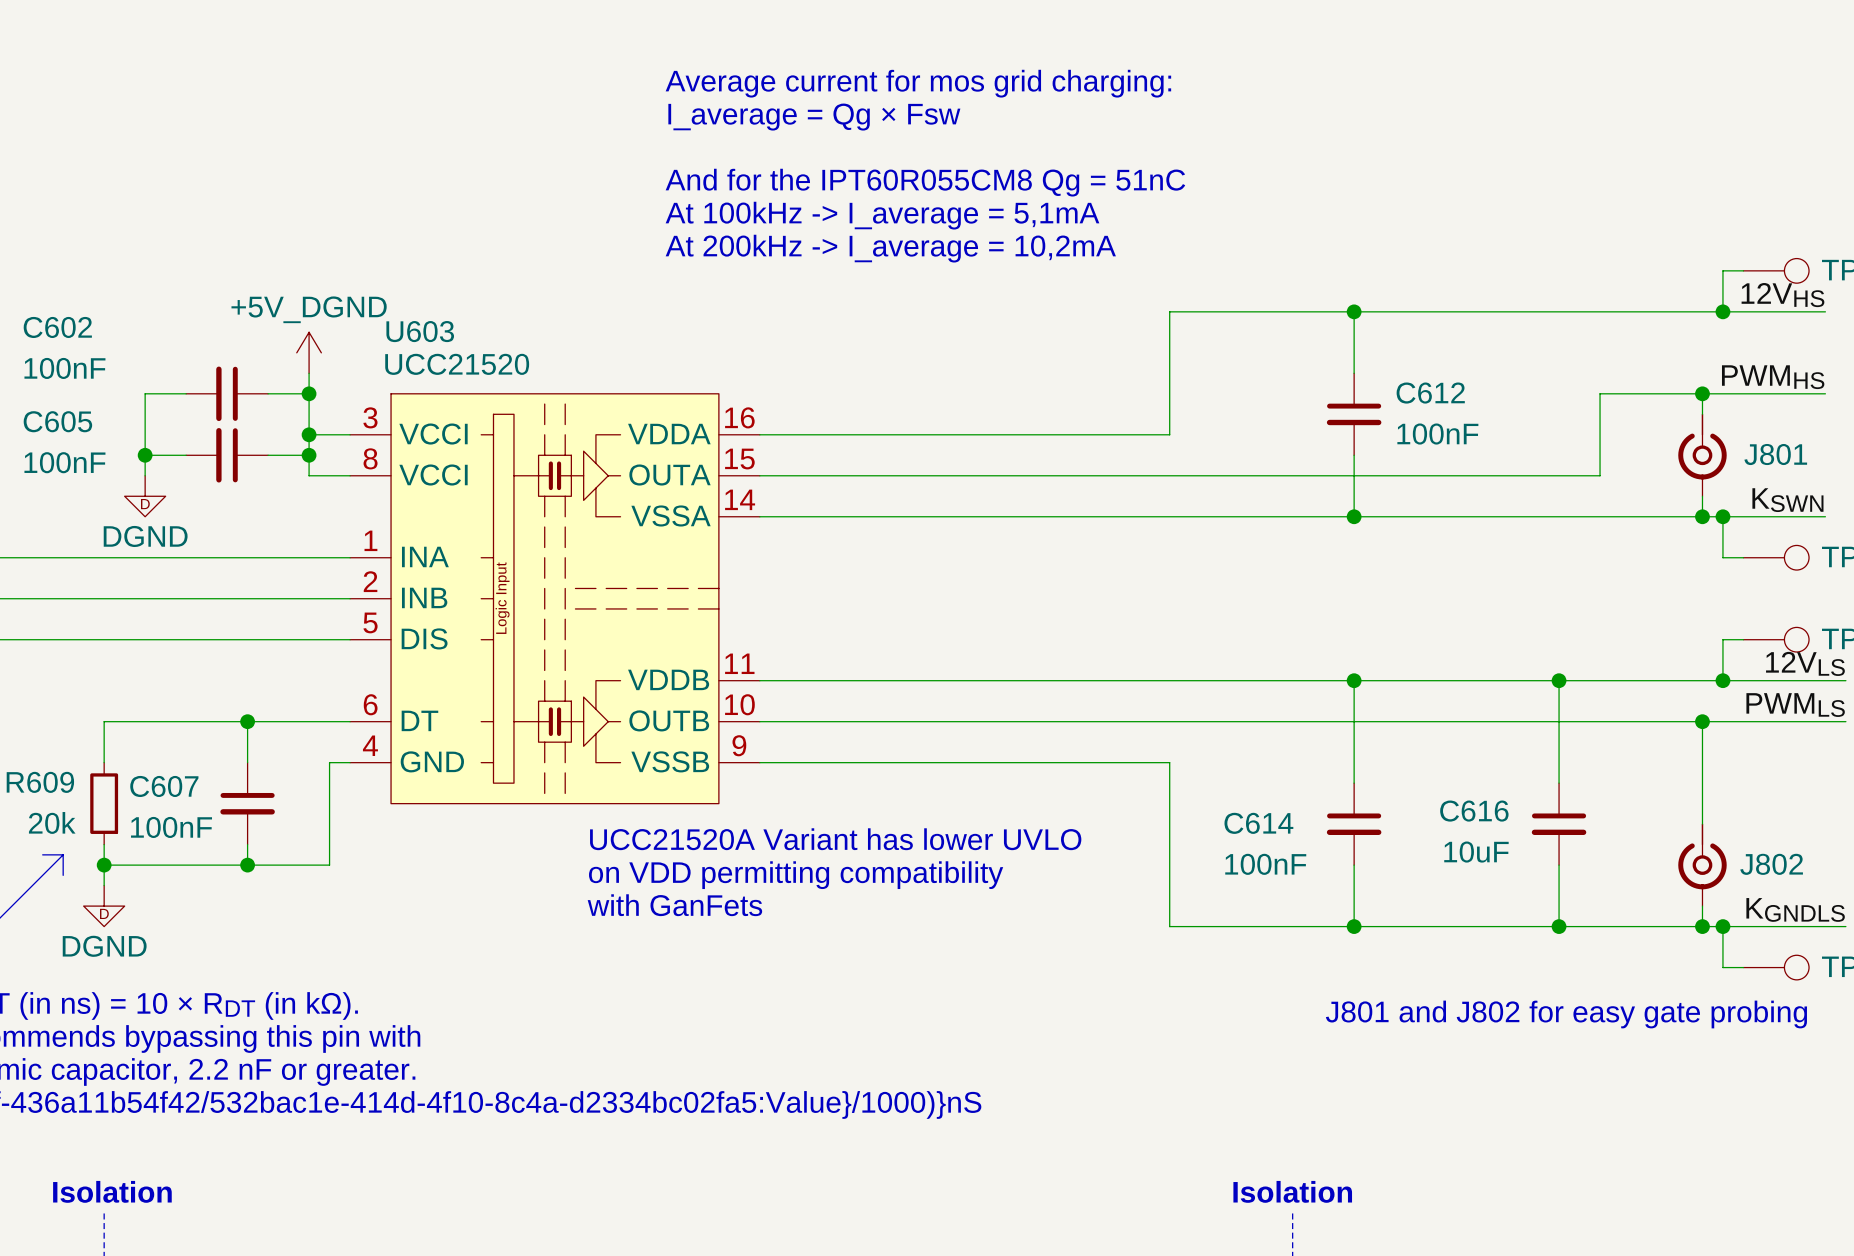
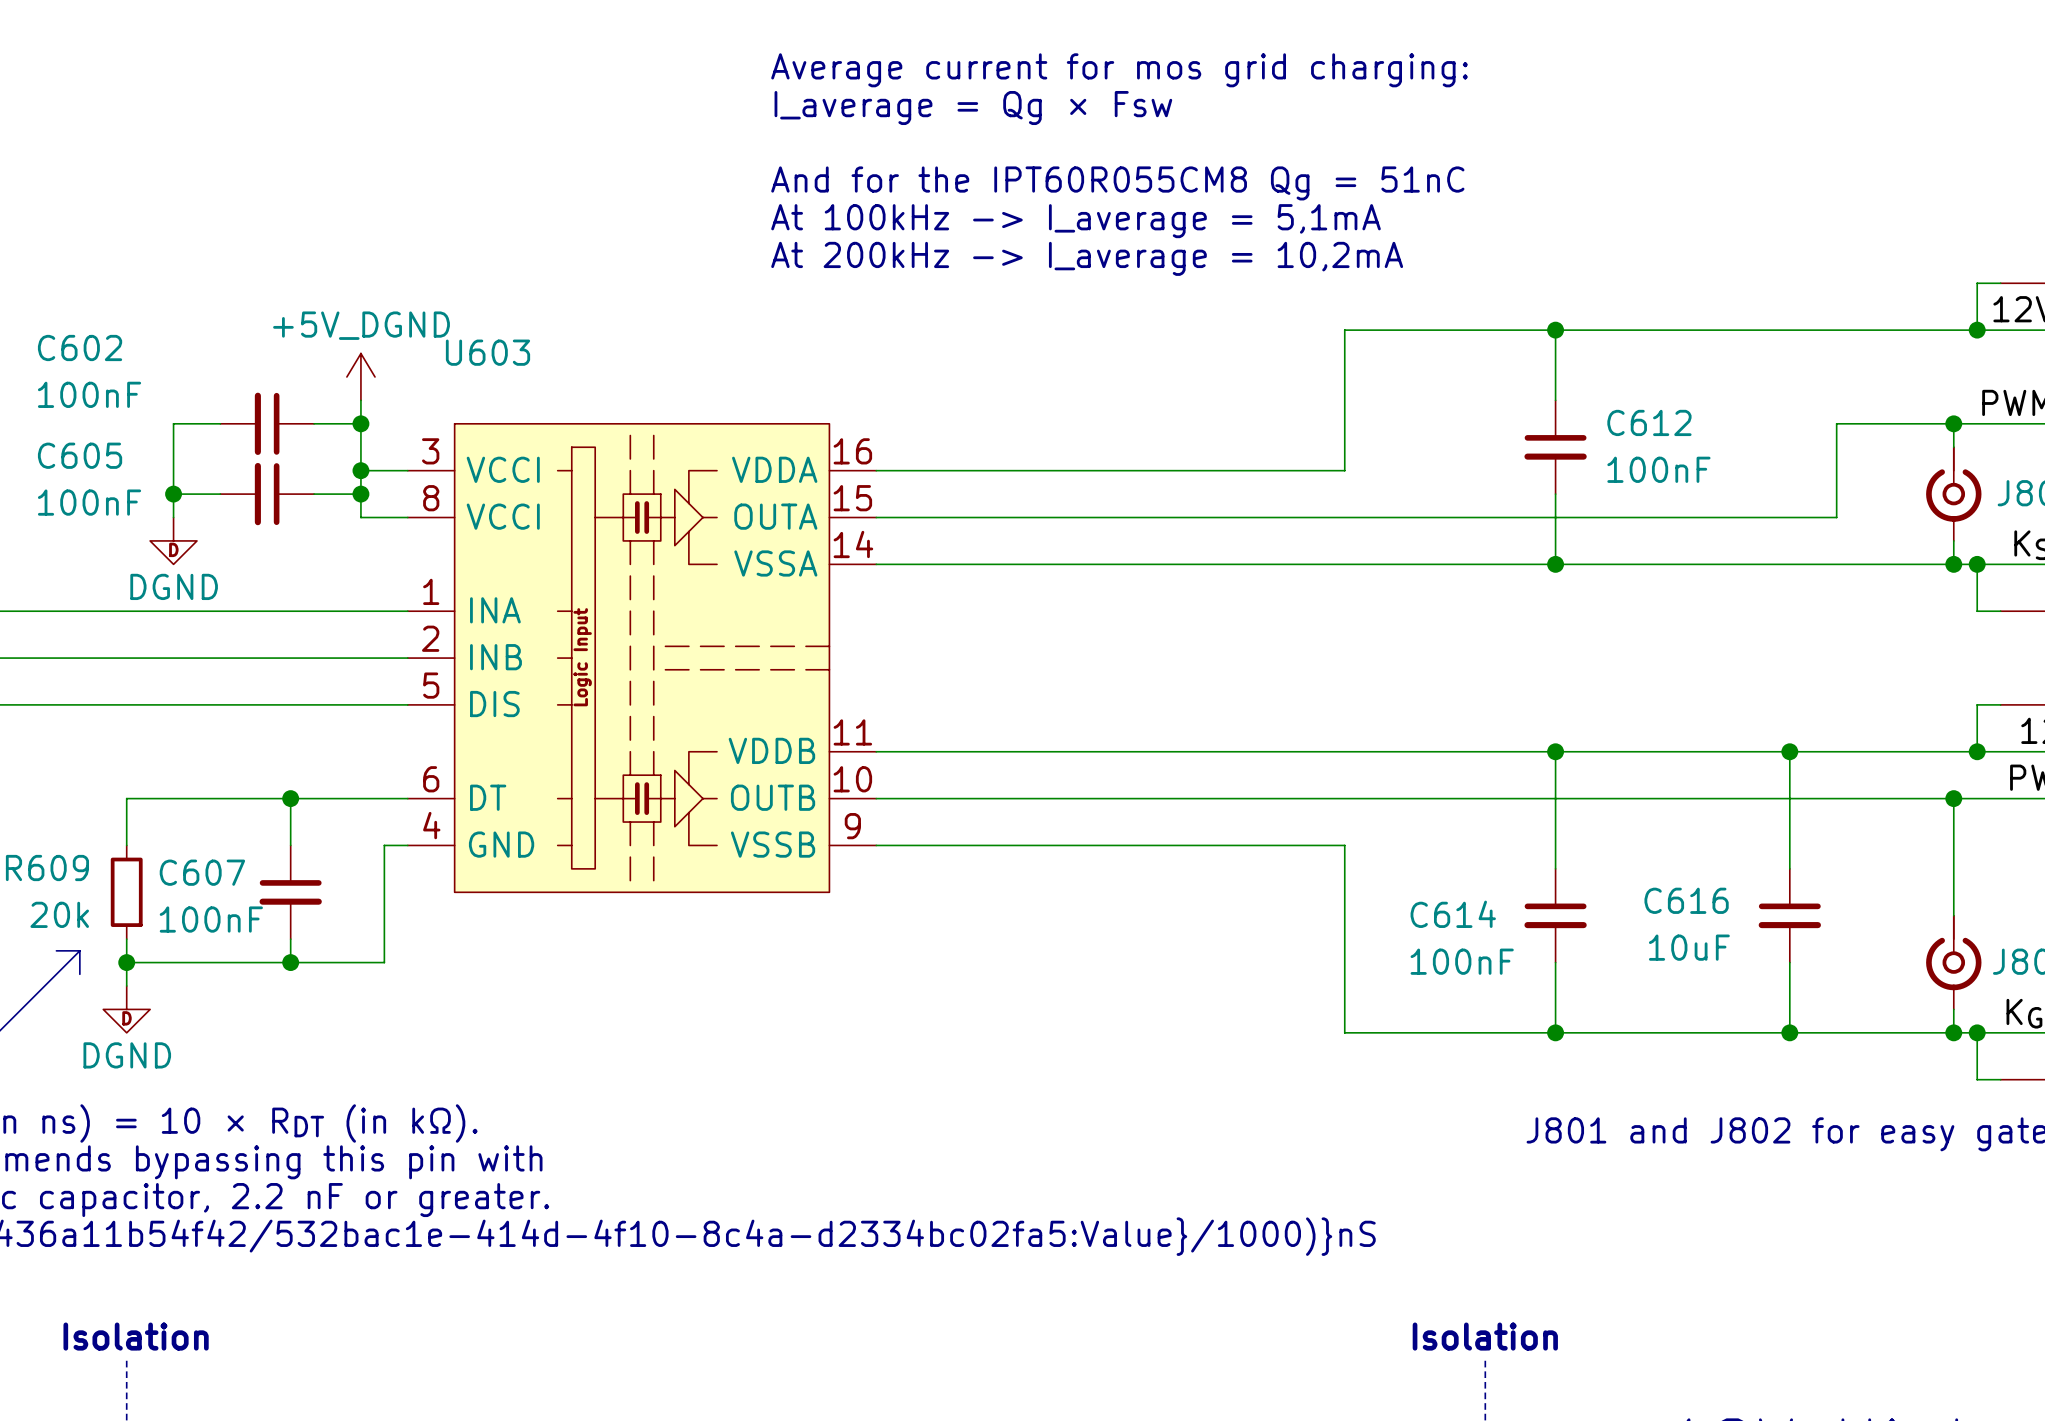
U603 value: UCC21520 (457, 364) -> none
text: UCC21520A Variant has lower UVLO (835, 839) -> none
text: on VDD permitting compatibility (796, 875) -> none
text: with GanFets (674, 905) -> none

